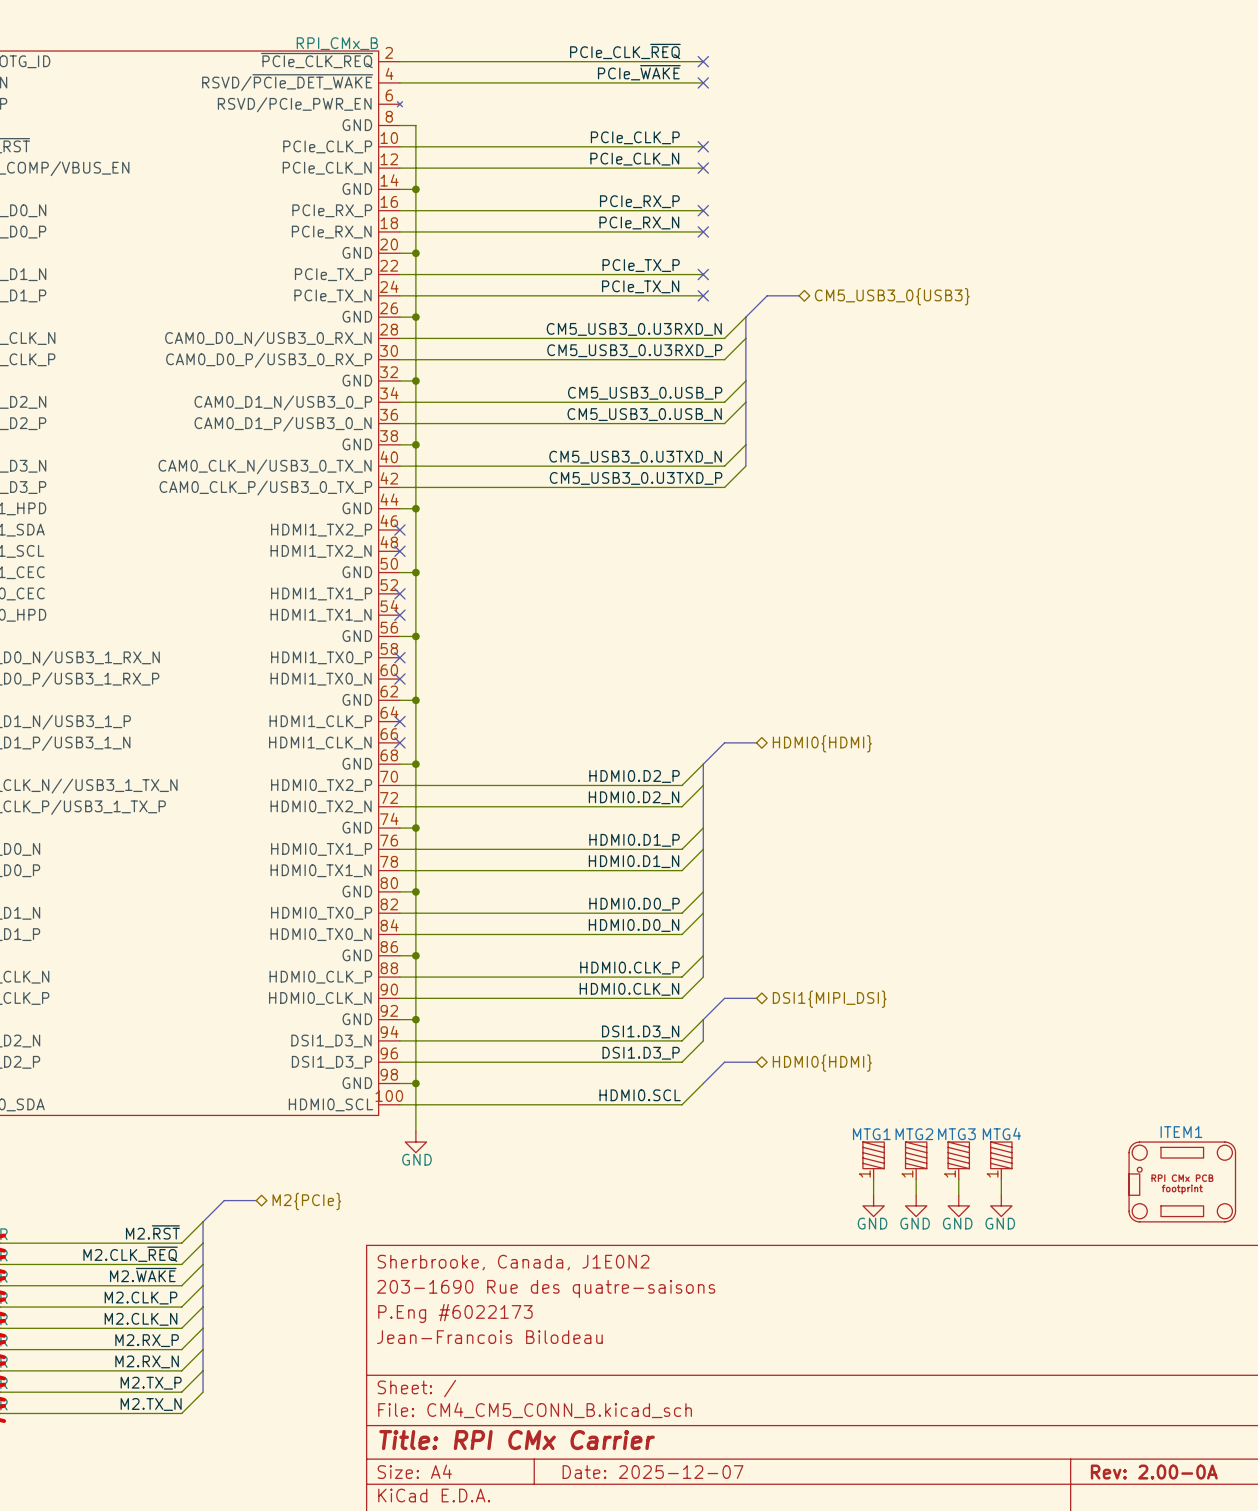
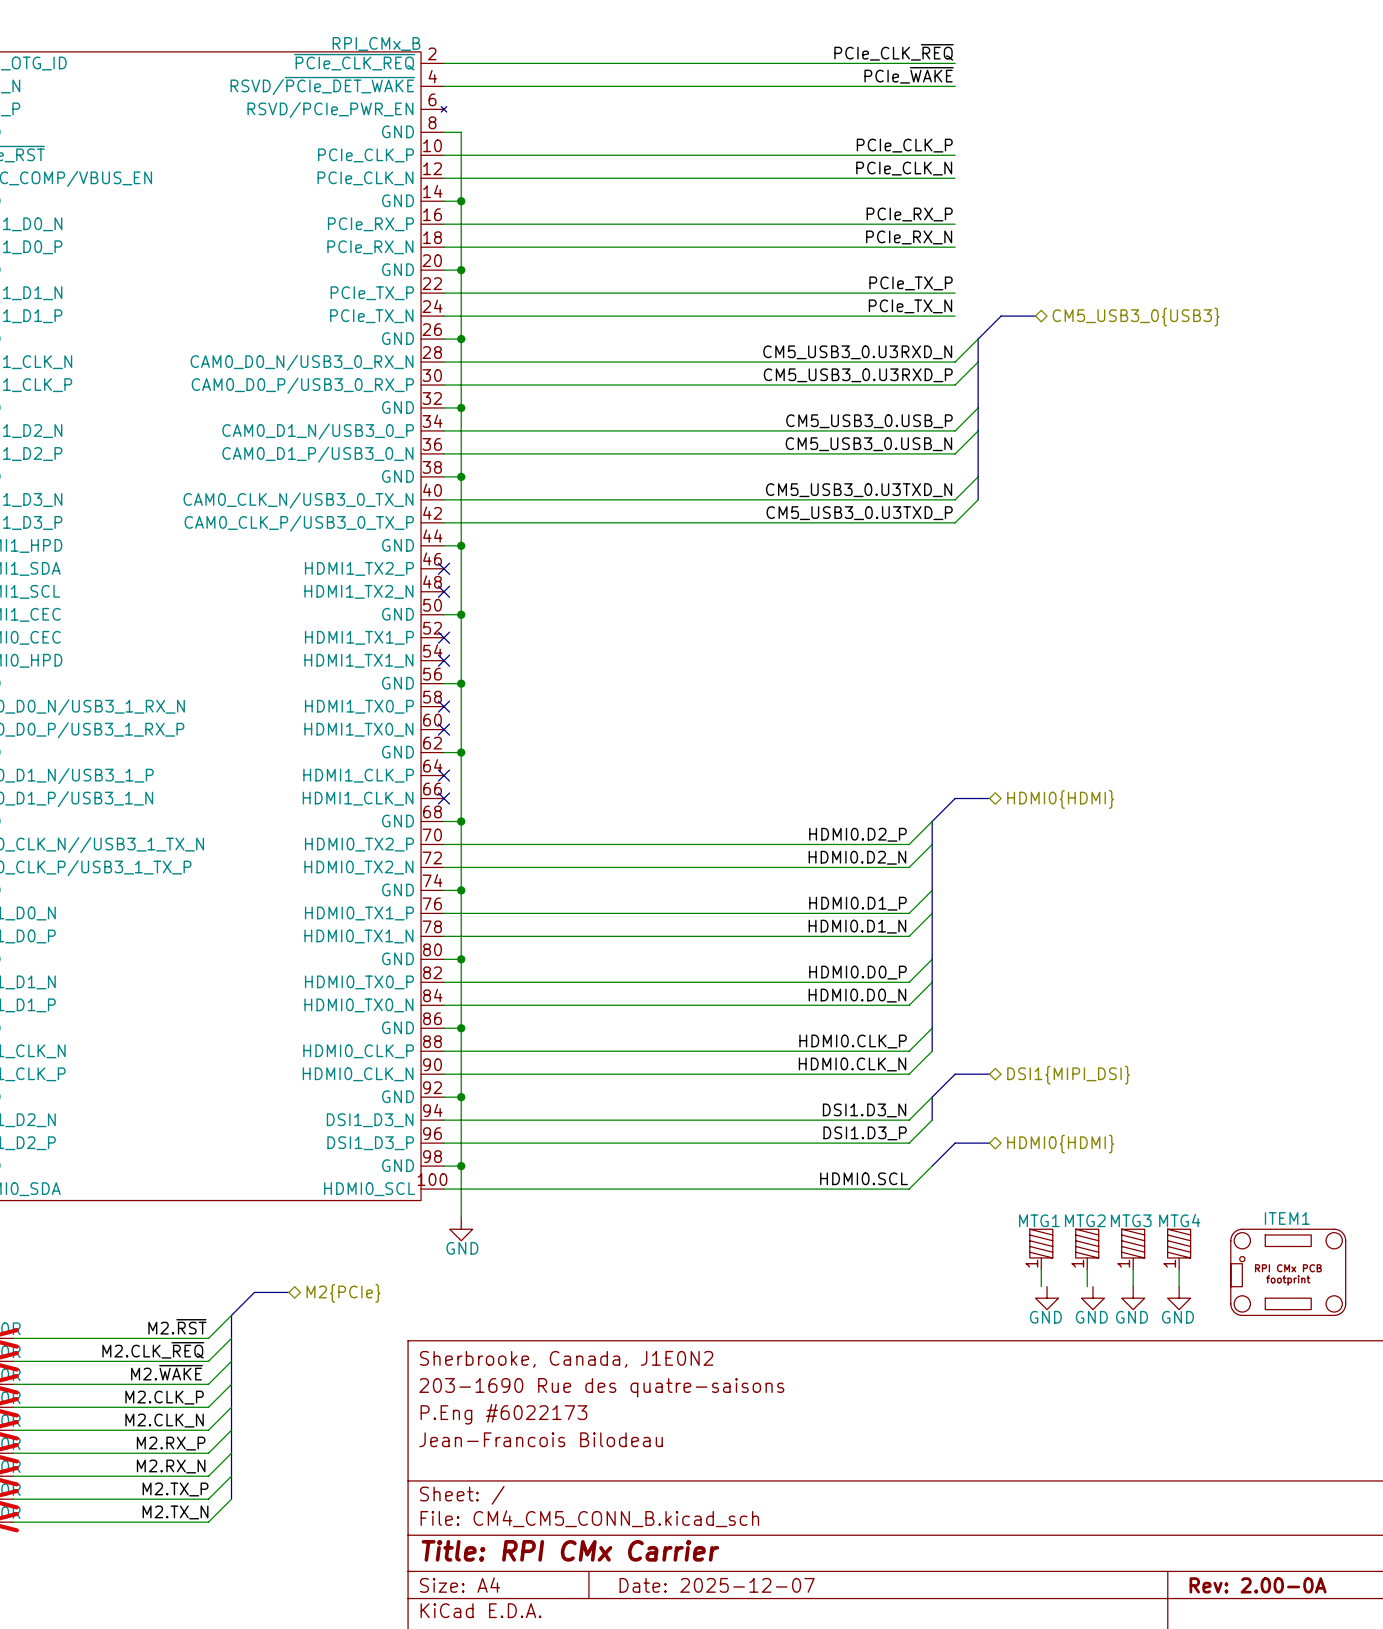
label position: PCIe_CLK_~{REQ} (625, 51) -> PCIe_CLK_~{REQ} (894, 52)
wire: none -> (771, 63) (955, 63)
no-connect mark: (703, 61) -> none
label position: PCIe_~{WAKE} (639, 72) -> PCIe_~{WAKE} (909, 75)
wire: none -> (771, 86) (955, 86)
no-connect mark: (703, 82) -> none
label position: PCIe_CLK_P (635, 137) -> PCIe_CLK_P (904, 145)
wire: none -> (771, 155) (955, 155)
no-connect mark: (703, 146) -> none
label position: PCIe_CLK_N (634, 159) -> PCIe_CLK_N (904, 168)
wire: none -> (771, 178) (955, 178)
no-connect mark: (703, 168) -> none
label position: PCIe_RX_P (639, 201) -> PCIe_RX_P (909, 214)
wire: none -> (771, 224) (955, 224)
no-connect mark: (703, 210) -> none
label position: PCIe_RX_N (639, 222) -> PCIe_RX_N (909, 237)
wire: none -> (771, 247) (955, 247)
no-connect mark: (703, 231) -> none
label position: PCIe_TX_P (641, 265) -> PCIe_TX_P (911, 283)
wire: none -> (771, 293) (955, 293)
no-connect mark: (703, 274) -> none
label position: PCIe_TX_N (640, 286) -> PCIe_TX_N (910, 306)
wire: none -> (771, 316) (955, 316)
no-connect mark: (703, 295) -> none
bus: (799, 295) (767, 295) (745, 317) (745, 466) -> (1035, 316) (1001, 316) (978, 339) (978, 499)
hierarchical label position: CM5_USB3_0{USB3} (892, 296) -> CM5_USB3_0{USB3} (1136, 317)
wire: (745, 317) (724, 338) -> (978, 339) (955, 362) (794, 362)
label position: CM5_USB3_0.U3RXD_N (634, 329) -> CM5_USB3_0.U3RXD_N (857, 352)
wire: (745, 338) (724, 359) -> (955, 385) (794, 385)
wire: none -> (978, 362) (955, 385)
label position: CM5_USB3_0.U3RXD_P (634, 350) -> CM5_USB3_0.U3RXD_P (858, 375)
wire: (745, 380) (724, 402) -> (978, 407) (955, 430) (794, 430)
label position: CM5_USB3_0.USB_P (645, 393) -> CM5_USB3_0.USB_P (869, 421)
wire: (745, 402) (724, 423) -> (955, 453) (794, 453)
wire: none -> (978, 430) (955, 453)
label position: CM5_USB3_0.USB_N (644, 414) -> CM5_USB3_0.USB_N (868, 444)
wire: (745, 444) (724, 466) -> (978, 476) (955, 499) (794, 499)
label position: CM5_USB3_0.U3TXD_N (635, 457) -> CM5_USB3_0.U3TXD_N (859, 490)
wire: (745, 466) (724, 487) -> (955, 522) (794, 522)
wire: none -> (978, 499) (955, 522)
label position: CM5_USB3_0.U3TXD_P (636, 478) -> CM5_USB3_0.U3TXD_P (859, 513)
bus: (756, 742) (724, 742) (703, 764) (703, 977) -> (989, 798) (955, 798) (932, 821) (932, 1051)
hierarchical label position: HDMI0{HDMI} (822, 743) -> HDMI0{HDMI} (1060, 799)
wire: (703, 764) (682, 785) -> (932, 821) (909, 844) (748, 844)
label position: HDMI0.D2_P (634, 776) -> HDMI0.D2_P (857, 834)
wire: (703, 785) (682, 806) -> (932, 844) (909, 867) (748, 867)
label position: HDMI0.D2_N (634, 797) -> HDMI0.D2_N (857, 857)
wire: (703, 828) (682, 849) -> (932, 890) (909, 913) (748, 913)
label position: HDMI0.D1_P (634, 840) -> HDMI0.D1_P (857, 903)
wire: (703, 849) (682, 870) -> (909, 936) (748, 936)
wire: none -> (932, 913) (909, 936)
label position: HDMI0.D1_N (634, 861) -> HDMI0.D1_N (857, 926)
wire: (703, 891) (682, 913) -> (909, 982) (748, 982)
wire: none -> (932, 959) (909, 982)
label position: HDMI0.D0_P (634, 904) -> HDMI0.D0_P (857, 972)
wire: (703, 913) (682, 934) -> (932, 982) (909, 1005) (748, 1005)
label position: HDMI0.D0_N (634, 925) -> HDMI0.D0_N (857, 995)
wire: (703, 955) (682, 977) -> (909, 1051) (748, 1051)
wire: none -> (932, 1028) (909, 1051)
label position: HDMI0.CLK_P (629, 968) -> HDMI0.CLK_P (853, 1041)
wire: (703, 977) (682, 998) -> (932, 1051) (909, 1074) (748, 1074)
label position: HDMI0.CLK_N (629, 989) -> HDMI0.CLK_N (852, 1064)
bus: (756, 998) (724, 998) (703, 1019) (703, 1040) -> (989, 1074) (955, 1074) (932, 1097) (932, 1120)
hierarchical label position: DSI1{MIPI_DSI} (829, 999) -> DSI1{MIPI_DSI} (1068, 1075)
wire: (703, 1019) (682, 1040) -> (932, 1097) (909, 1120) (748, 1120)
label position: DSI1.D3_N (640, 1031) -> DSI1.D3_N (864, 1110)
wire: (703, 1040) (682, 1062) -> (909, 1143) (748, 1143)
wire: none -> (932, 1120) (909, 1143)
label position: DSI1.D3_P (641, 1053) -> DSI1.D3_P (865, 1133)
bus: (756, 1062) (724, 1062) (703, 1083) -> (989, 1143) (955, 1143) (932, 1166)
hierarchical label position: HDMI0{HDMI} (822, 1063) -> HDMI0{HDMI} (1060, 1144)
wire: (703, 1083) (682, 1104) -> (932, 1166) (909, 1189) (748, 1189)
label position: HDMI0.SCL (640, 1095) -> HDMI0.SCL (863, 1178)
MTG1 position: (873, 1160) -> (1041, 1249)
MTG2 position: (916, 1160) -> (1087, 1249)
MTG3 position: (958, 1160) -> (1133, 1249)
MTG4 position: (1001, 1160) -> (1179, 1249)
wire: (873, 1179) (873, 1195) -> (1041, 1269) (1041, 1286)
wire: (916, 1179) (916, 1195) -> (1087, 1269) (1087, 1286)
wire: (958, 1179) (958, 1195) -> (1133, 1269) (1133, 1286)
wire: (1001, 1179) (1001, 1195) -> (1179, 1269) (1179, 1286)
power symbol: GND (873, 1205) -> none
power symbol: GND (916, 1205) -> none
power symbol: none -> GND (1133, 1298)
power symbol: none -> GND (1179, 1298)

